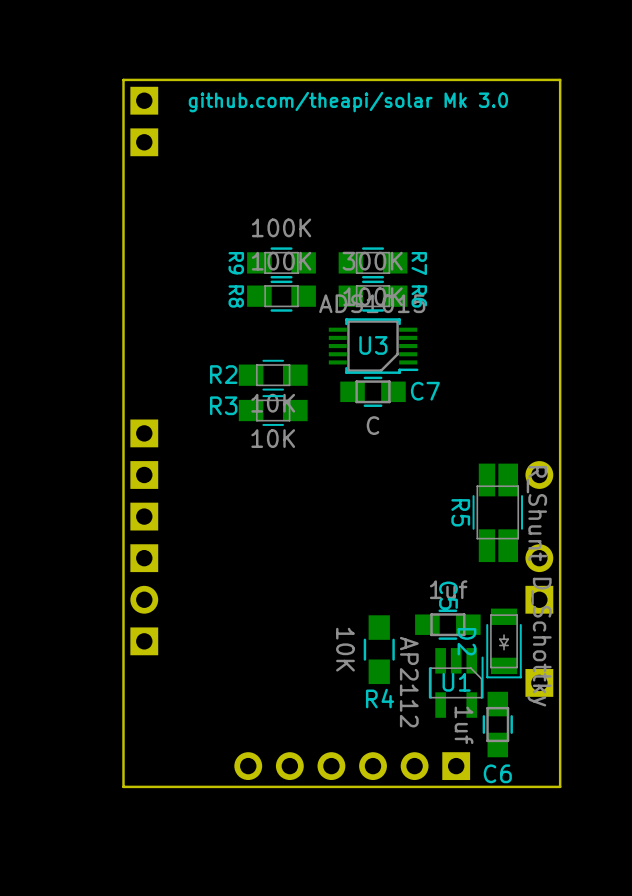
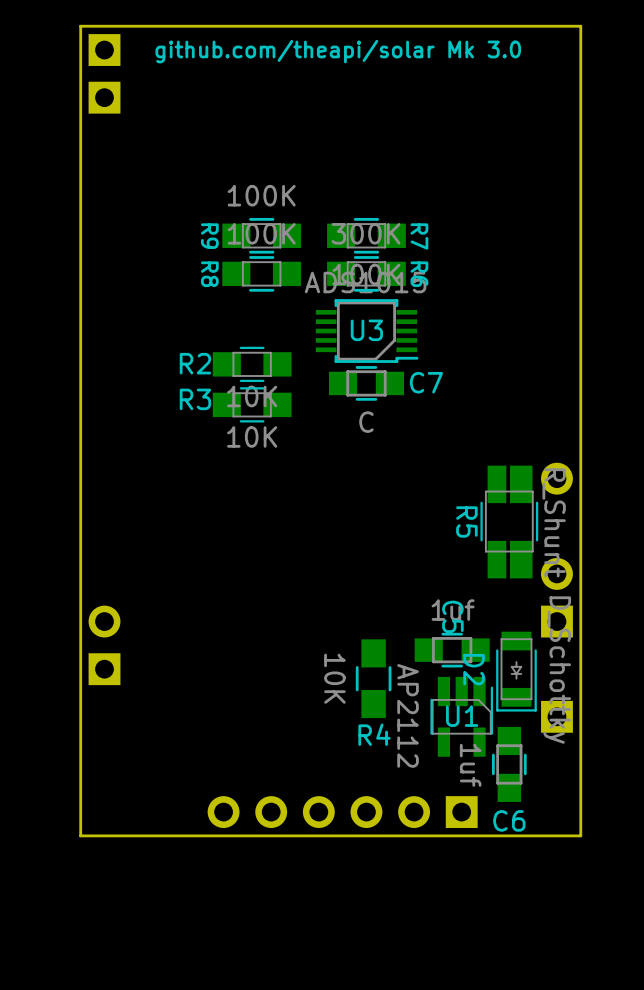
part: (144, 433) -> none
part: (144, 474) -> none
part: (144, 516) -> none
part: (144, 558) -> none

